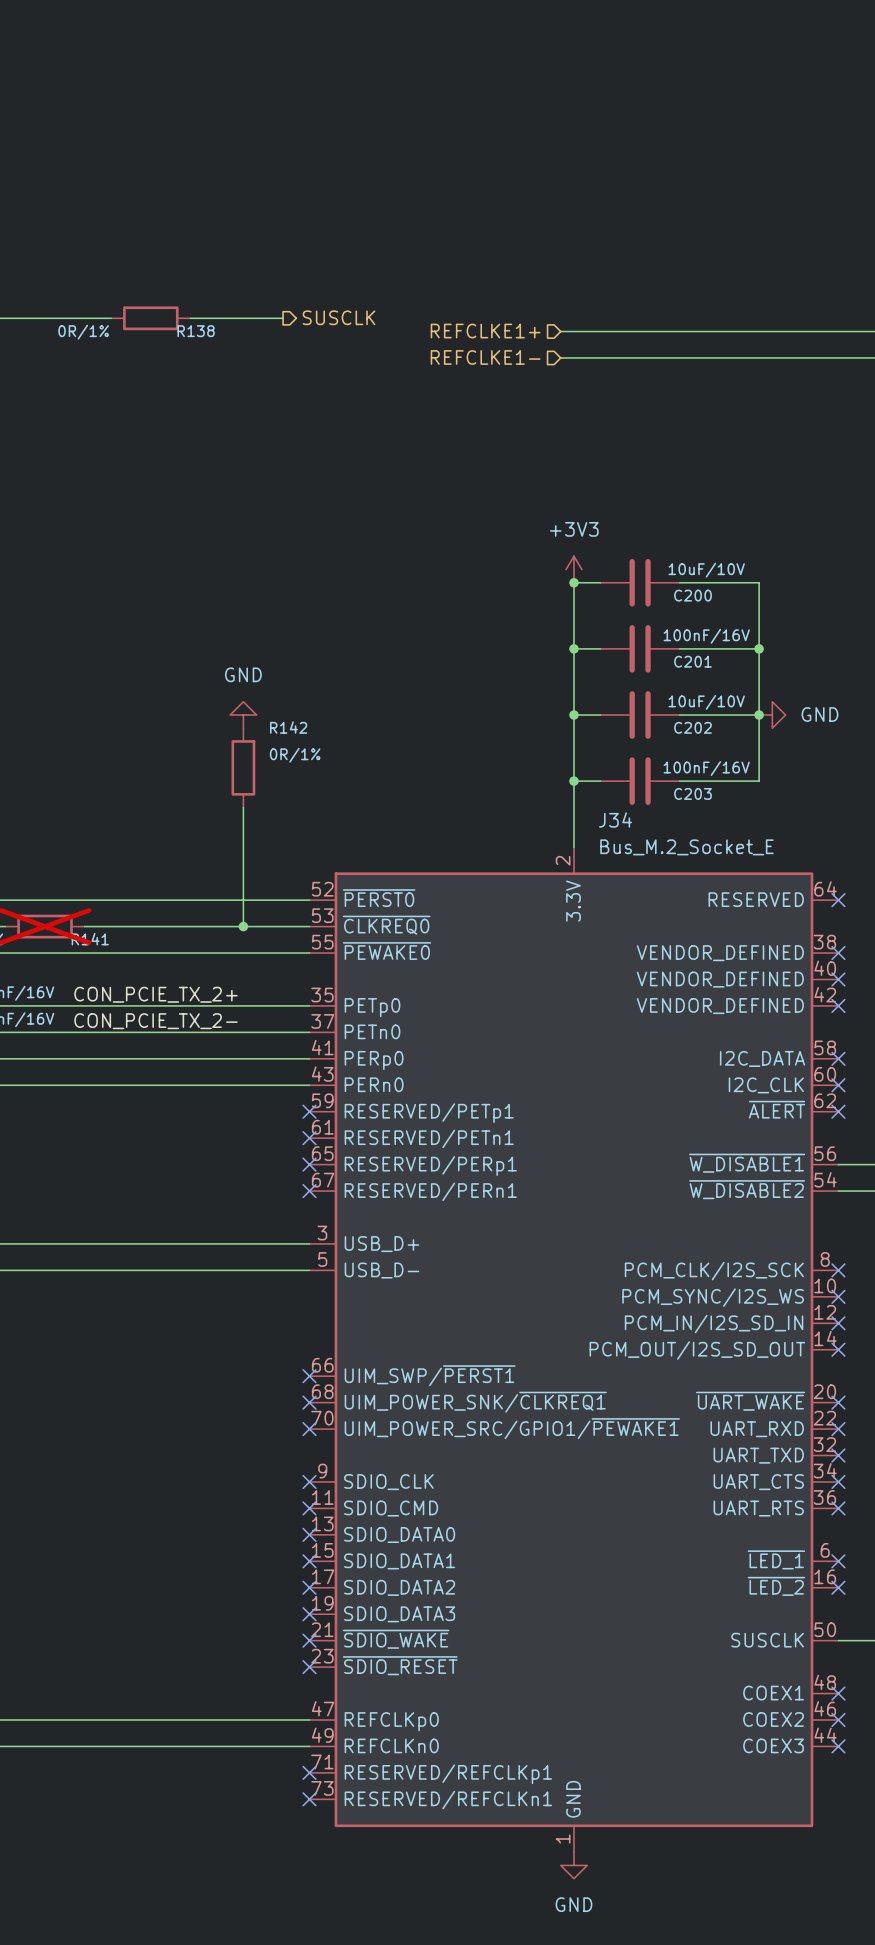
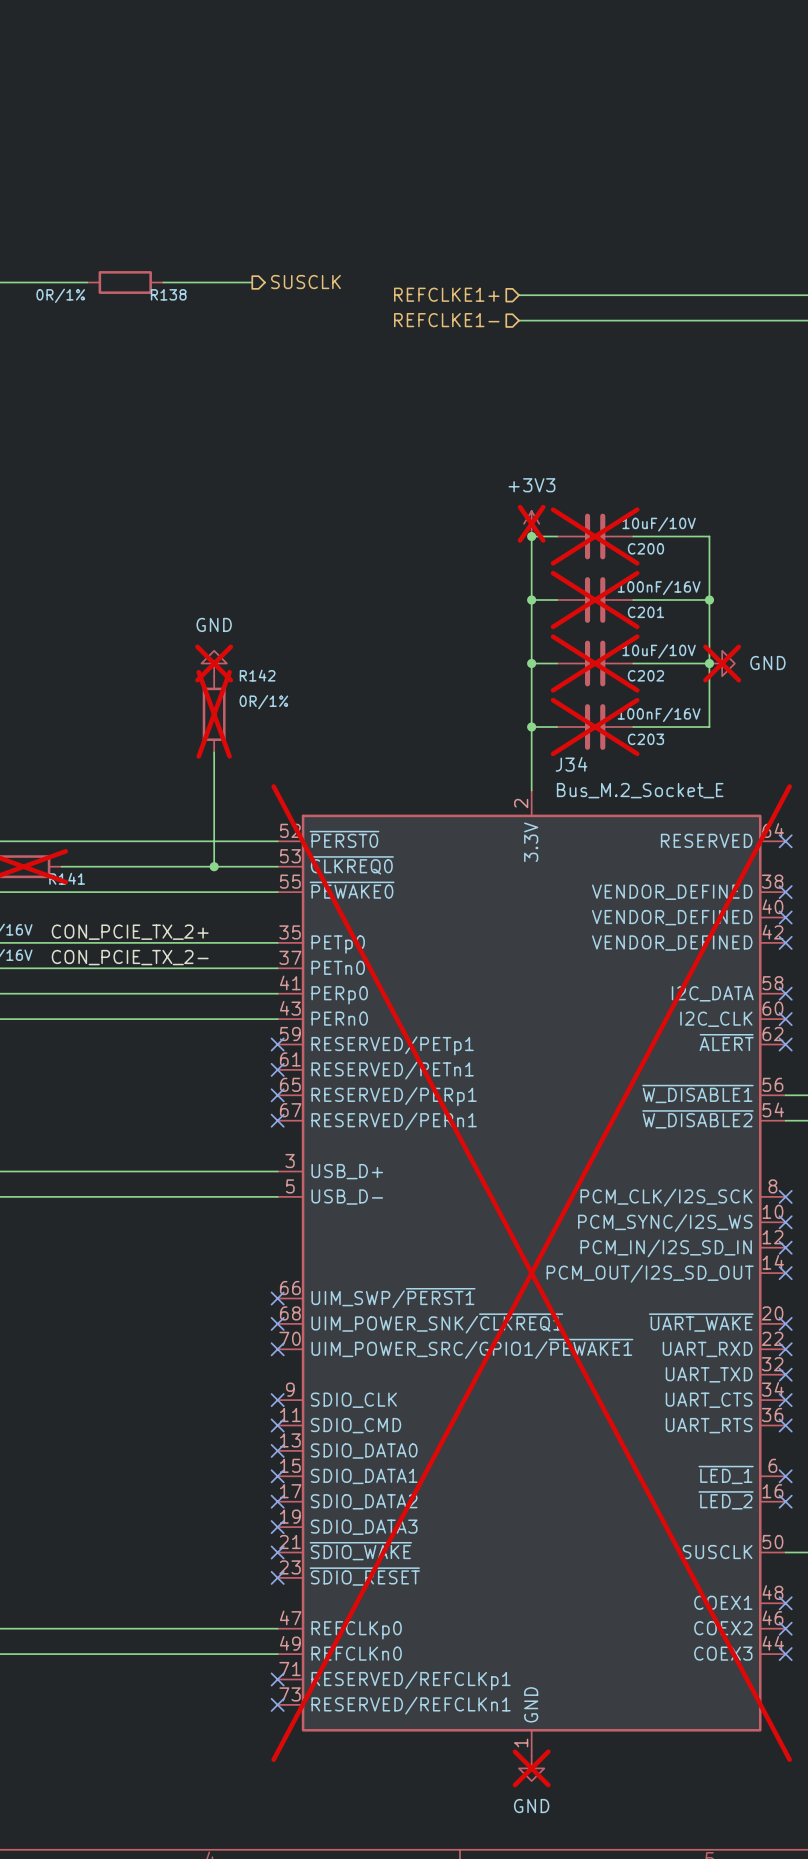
power symbol do-not-place cross: none -> (531, 523)
C200 do-not-place cross: none -> (595, 536)
C201 do-not-place cross: none -> (595, 600)
power symbol do-not-place cross: none -> (214, 663)
C202 do-not-place cross: none -> (595, 663)
power symbol do-not-place cross: none -> (722, 663)
R142 do-not-place cross: none -> (214, 714)
C203 do-not-place cross: none -> (595, 727)
J34 do-not-place cross: none -> (531, 1273)
power symbol do-not-place cross: none -> (531, 1768)

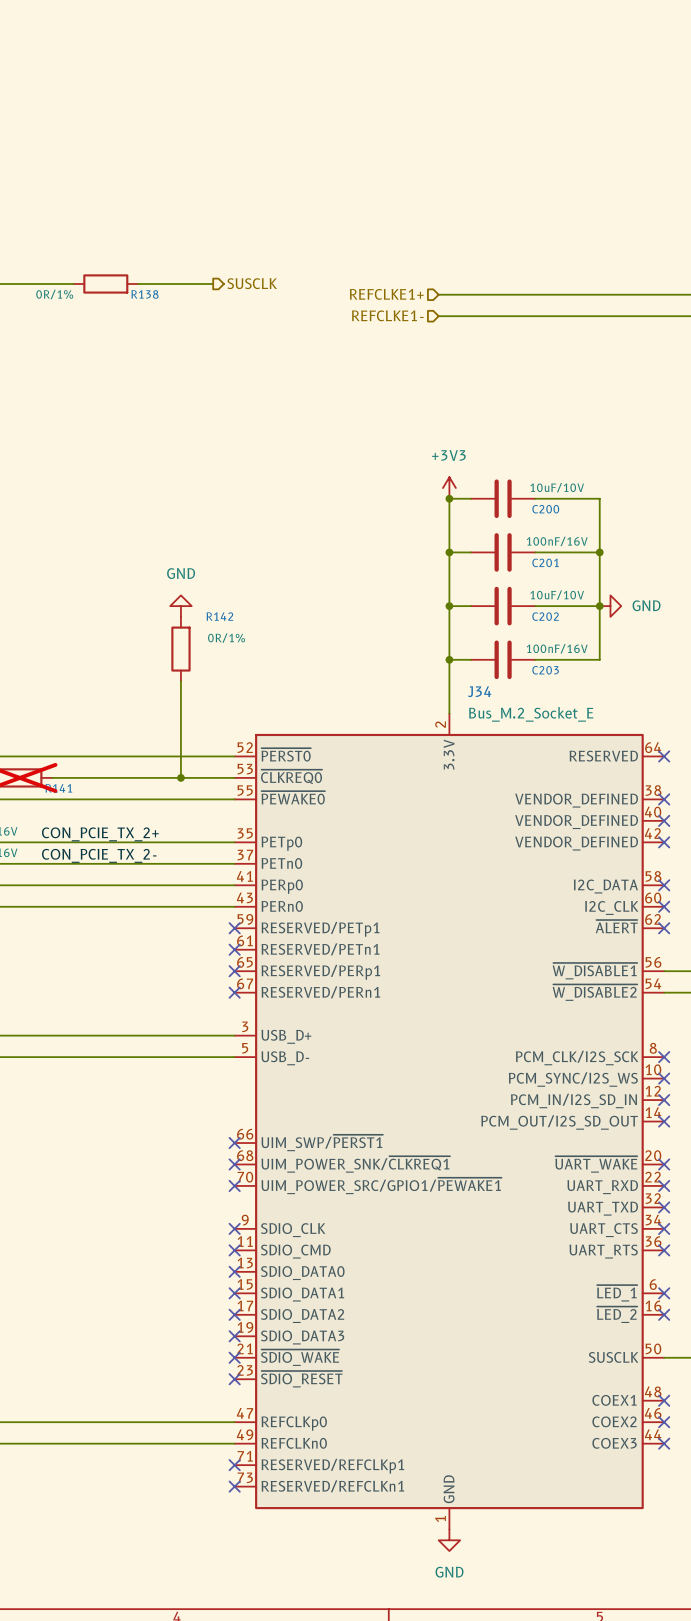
power symbol do-not-place cross: (531, 523) -> none
C200 do-not-place cross: (595, 536) -> none
C201 do-not-place cross: (595, 600) -> none
power symbol do-not-place cross: (214, 663) -> none
C202 do-not-place cross: (595, 663) -> none
power symbol do-not-place cross: (722, 663) -> none
R142 do-not-place cross: (214, 714) -> none
C203 do-not-place cross: (595, 727) -> none
J34 do-not-place cross: (531, 1273) -> none
power symbol do-not-place cross: (531, 1768) -> none

